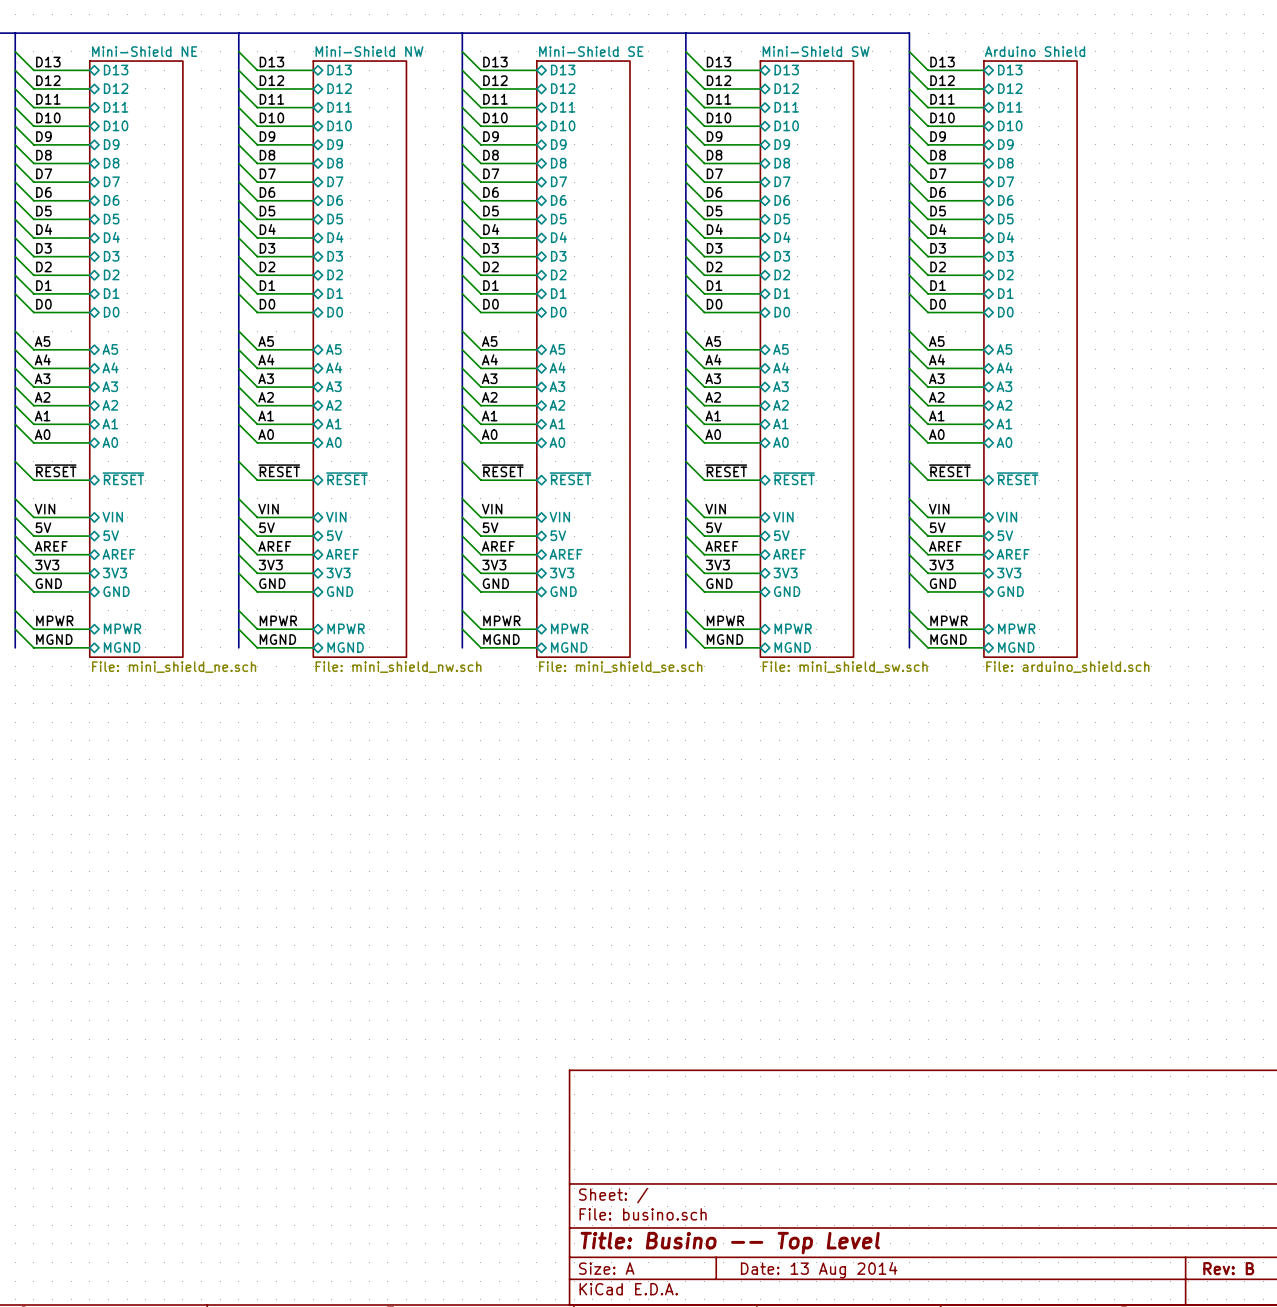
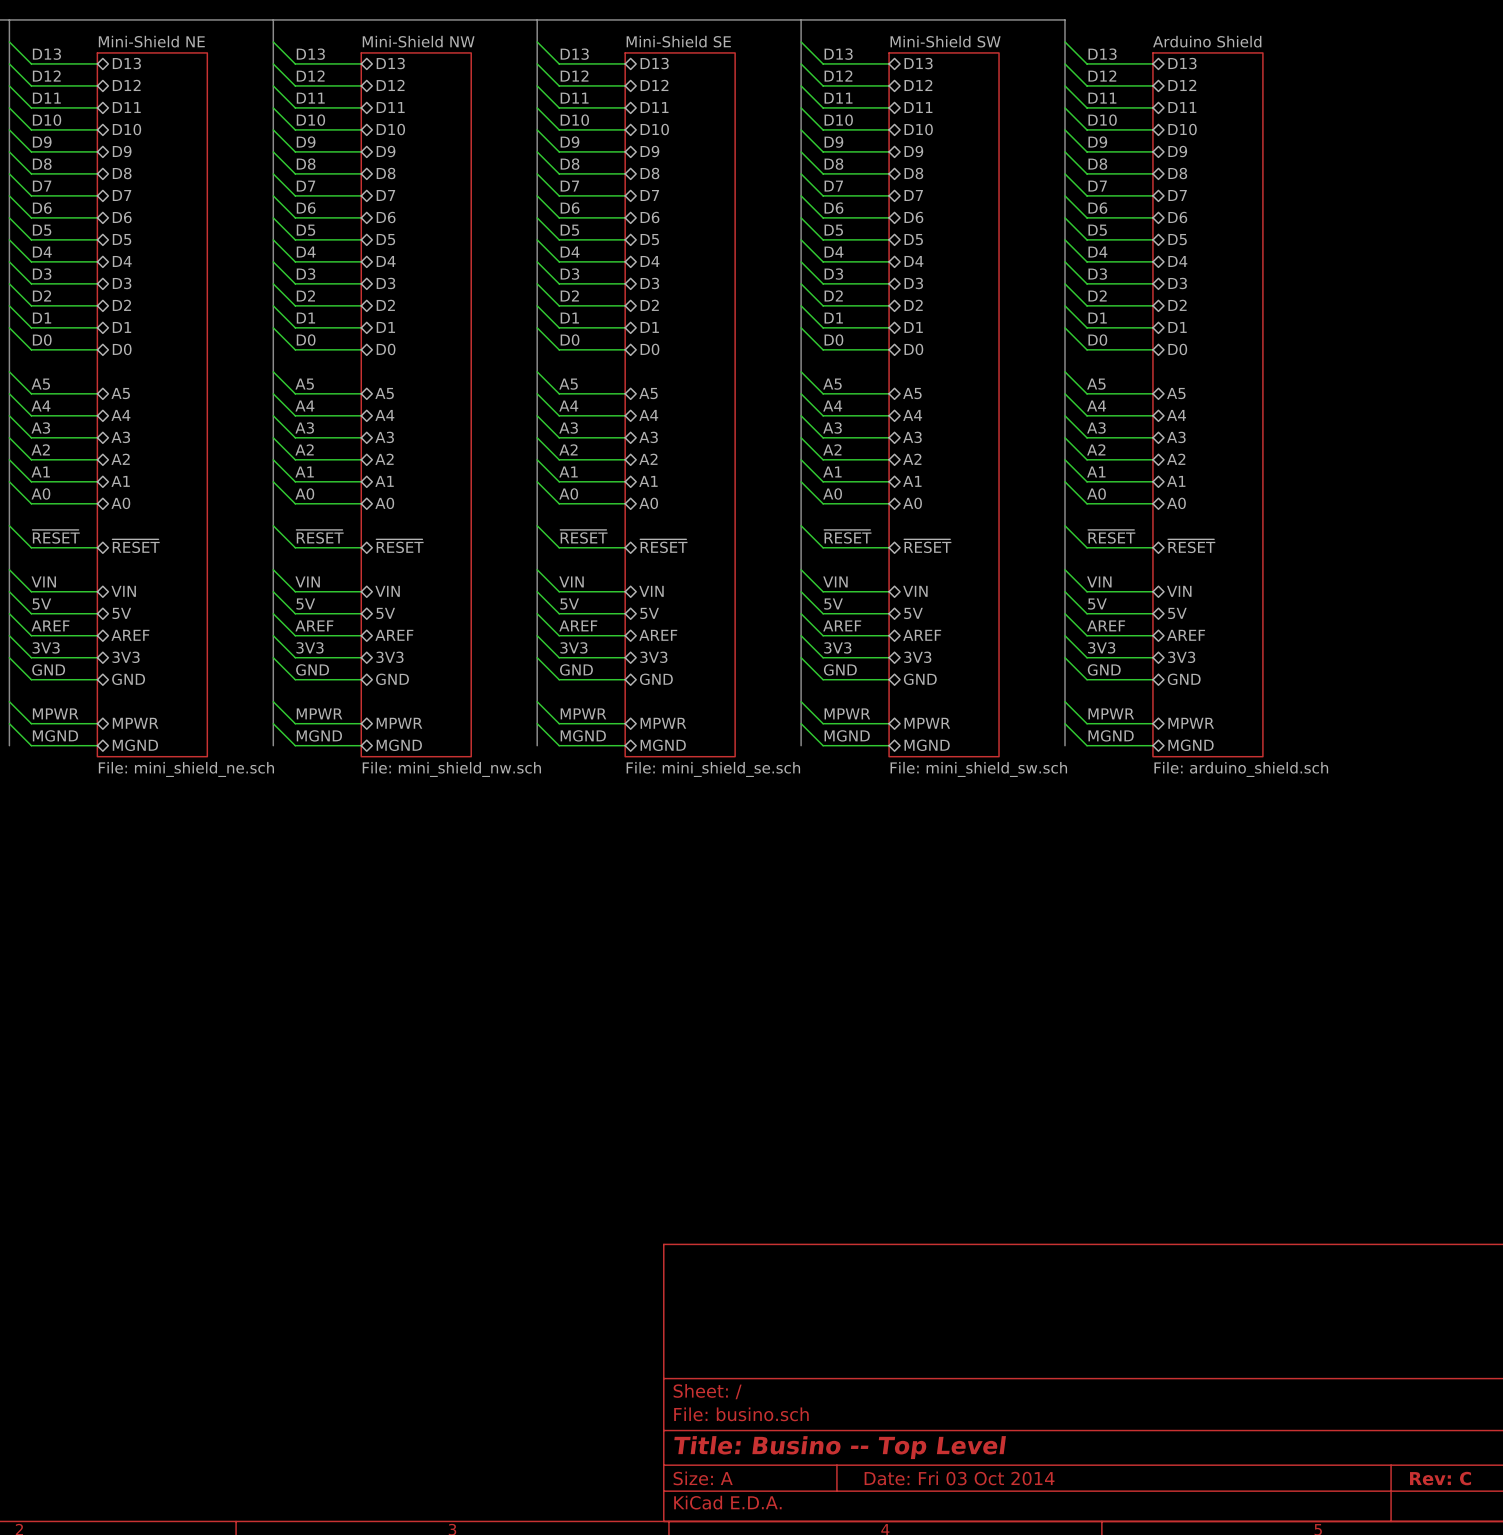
title block: Rev: B (1228, 1268) -> Rev: C (1440, 1478)
title block: Date: 13 Aug 2014 (819, 1270) -> Date: Fri 03 Oct 2014 (959, 1478)

